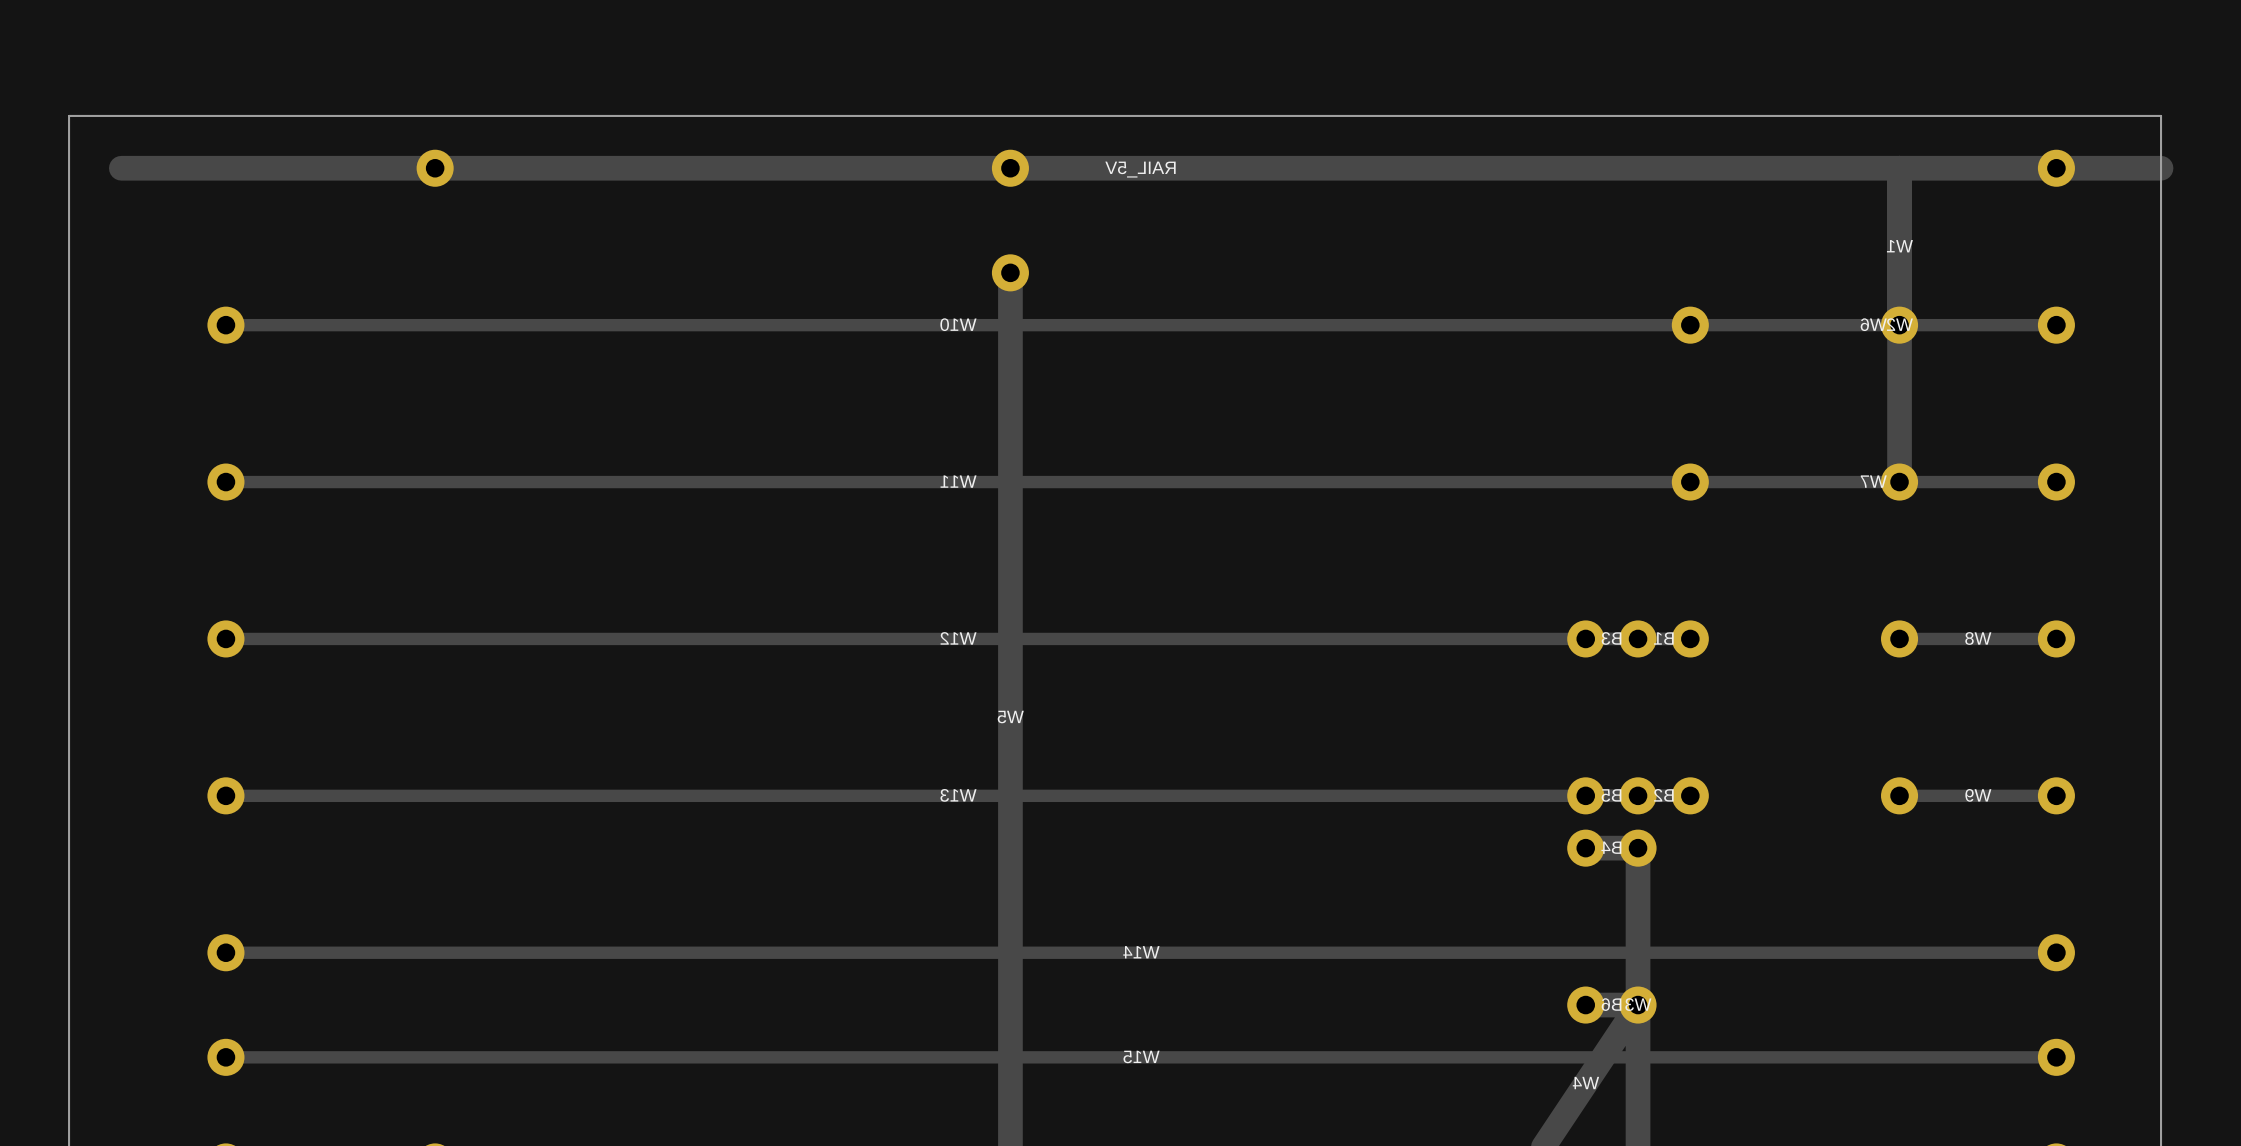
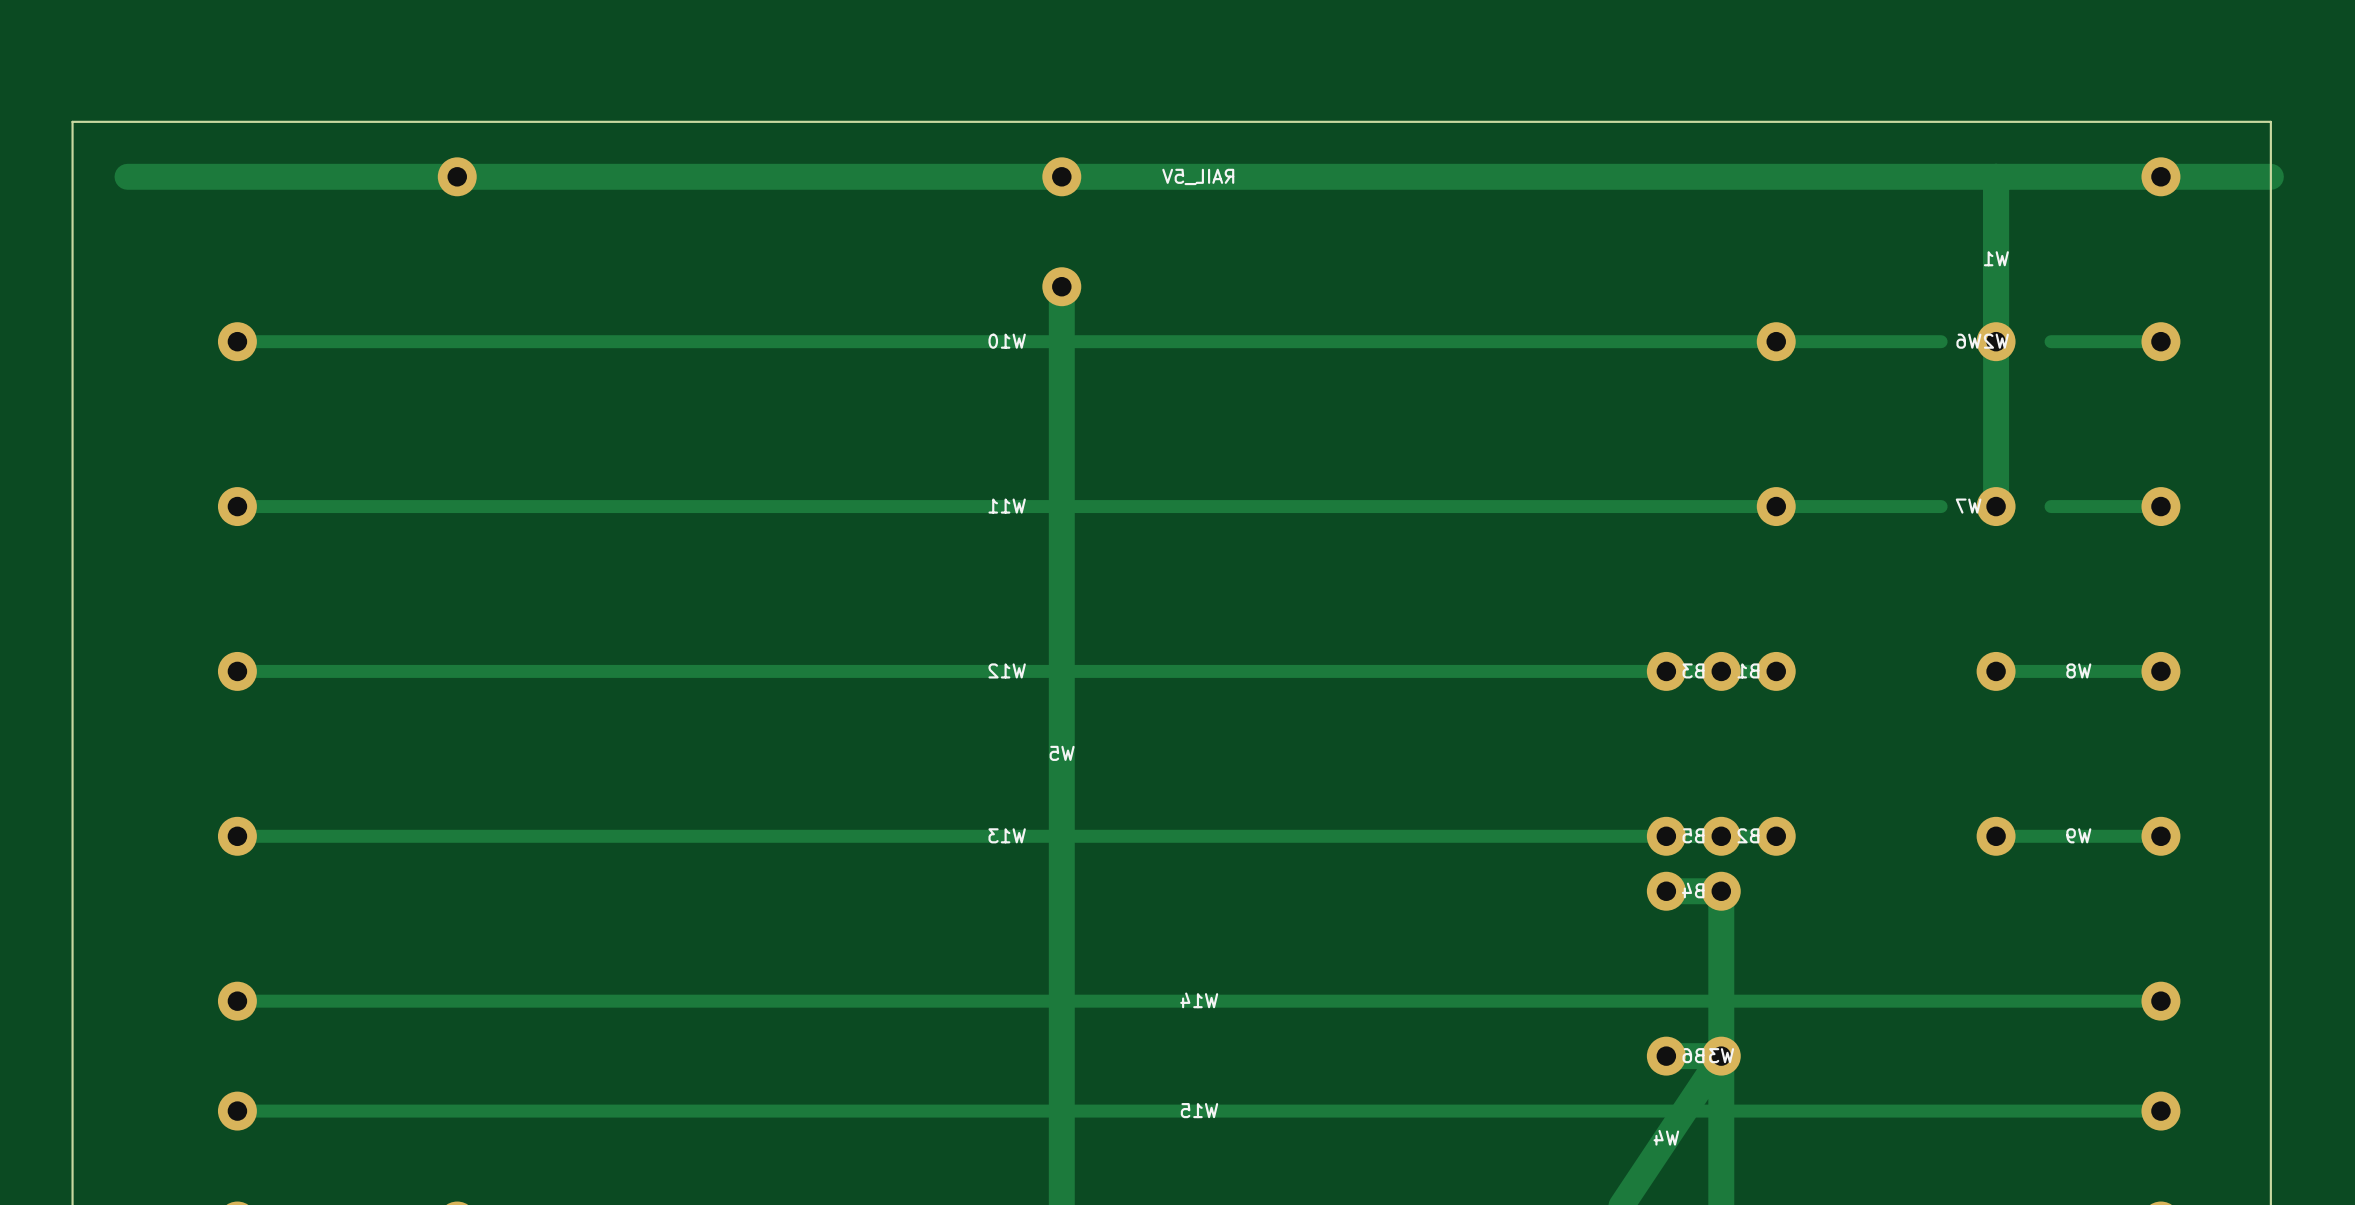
track: (1951, 325) (1847, 325) -> none
track: (1951, 482) (1847, 482) -> none

